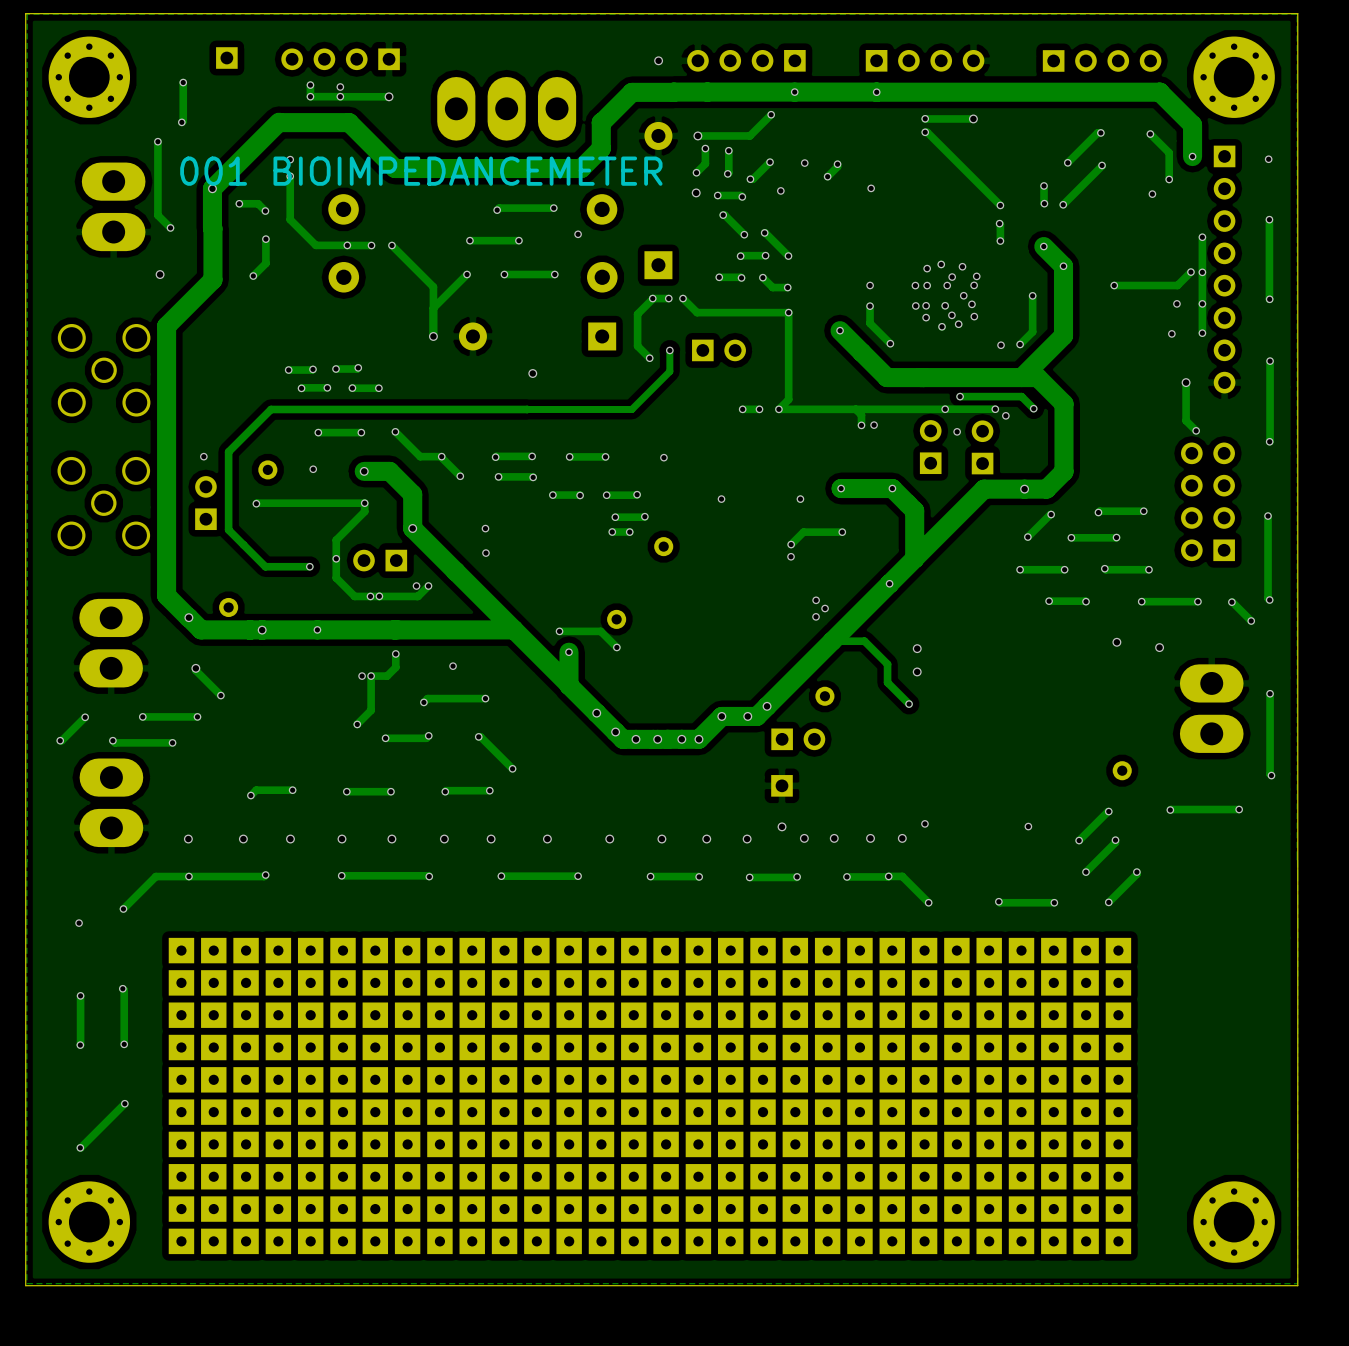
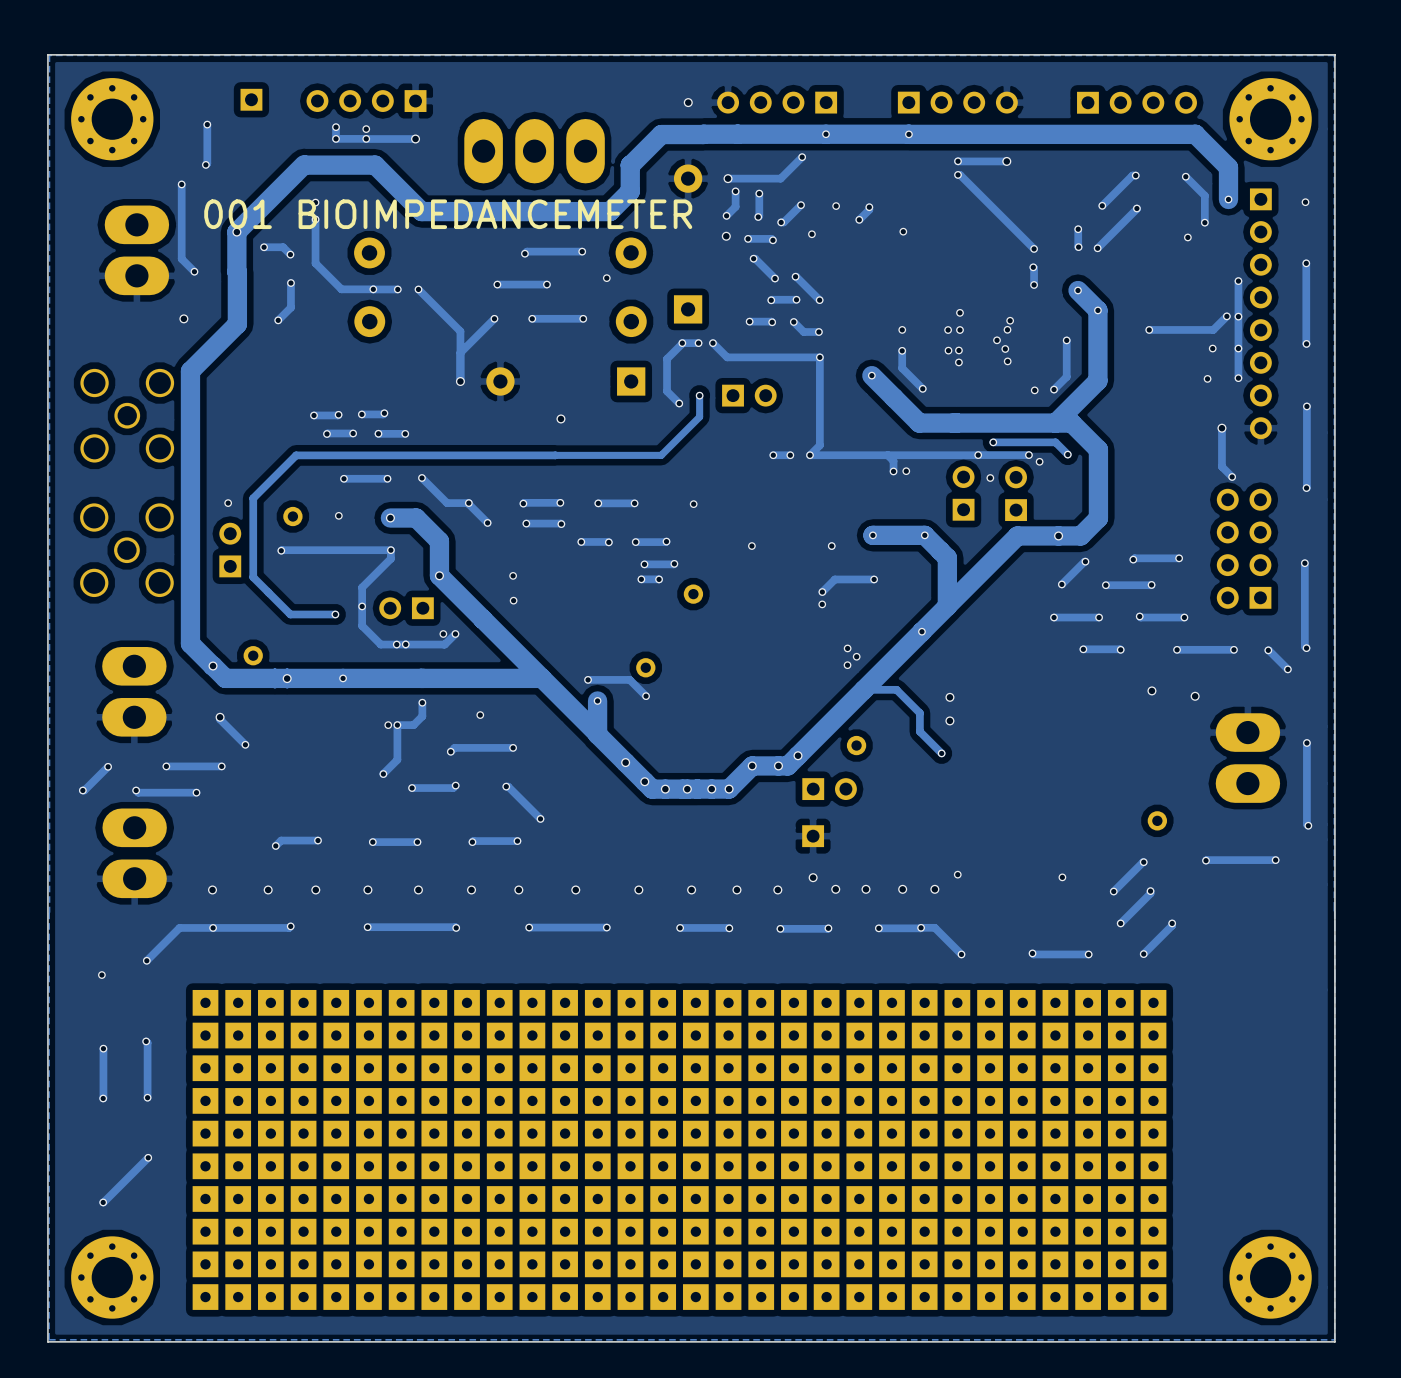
via: (941, 264) -> none
via: (962, 266) -> none
via: (952, 277) -> none
via: (947, 285) -> none
via: (945, 305) -> none
via: (951, 315) -> none
via: (958, 324) -> none
via: (942, 326) -> none

